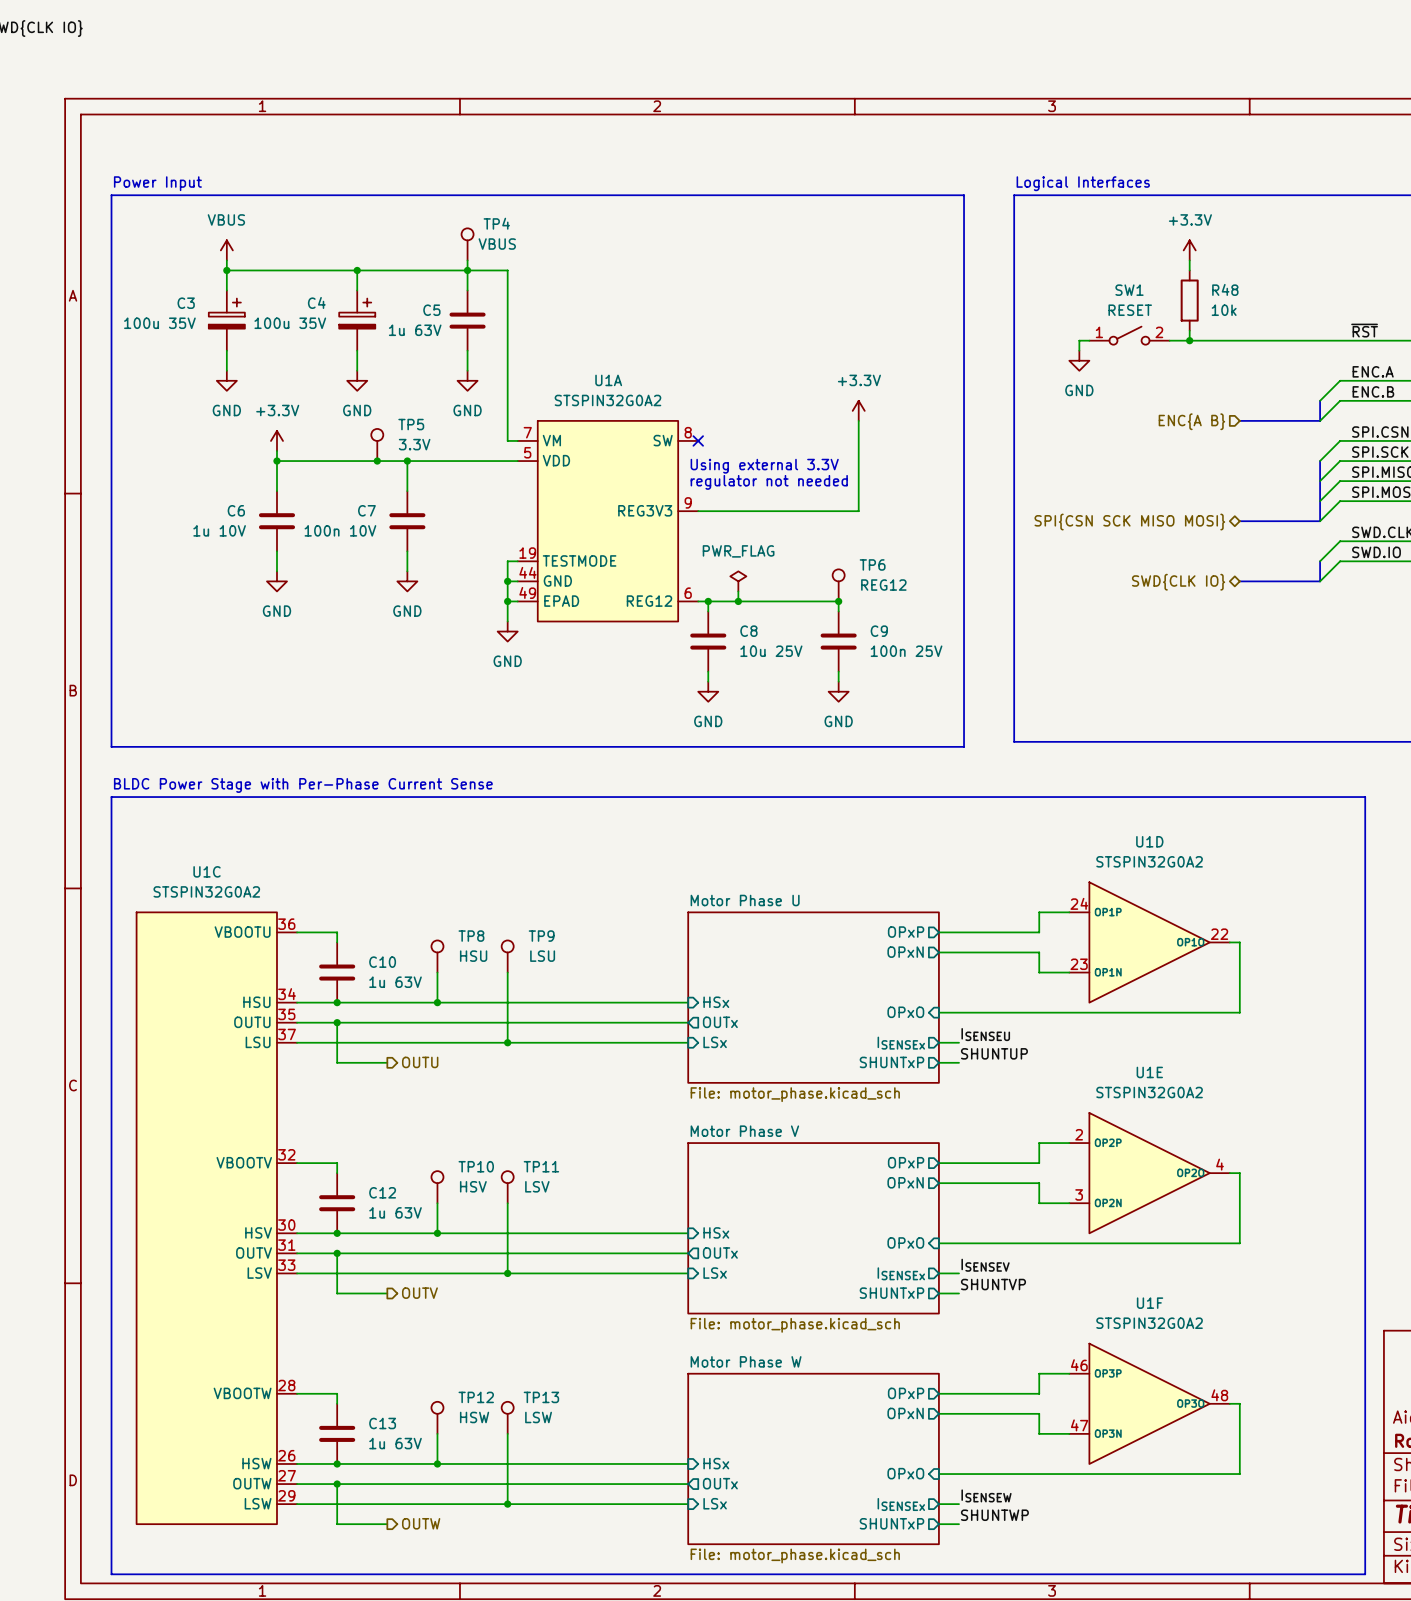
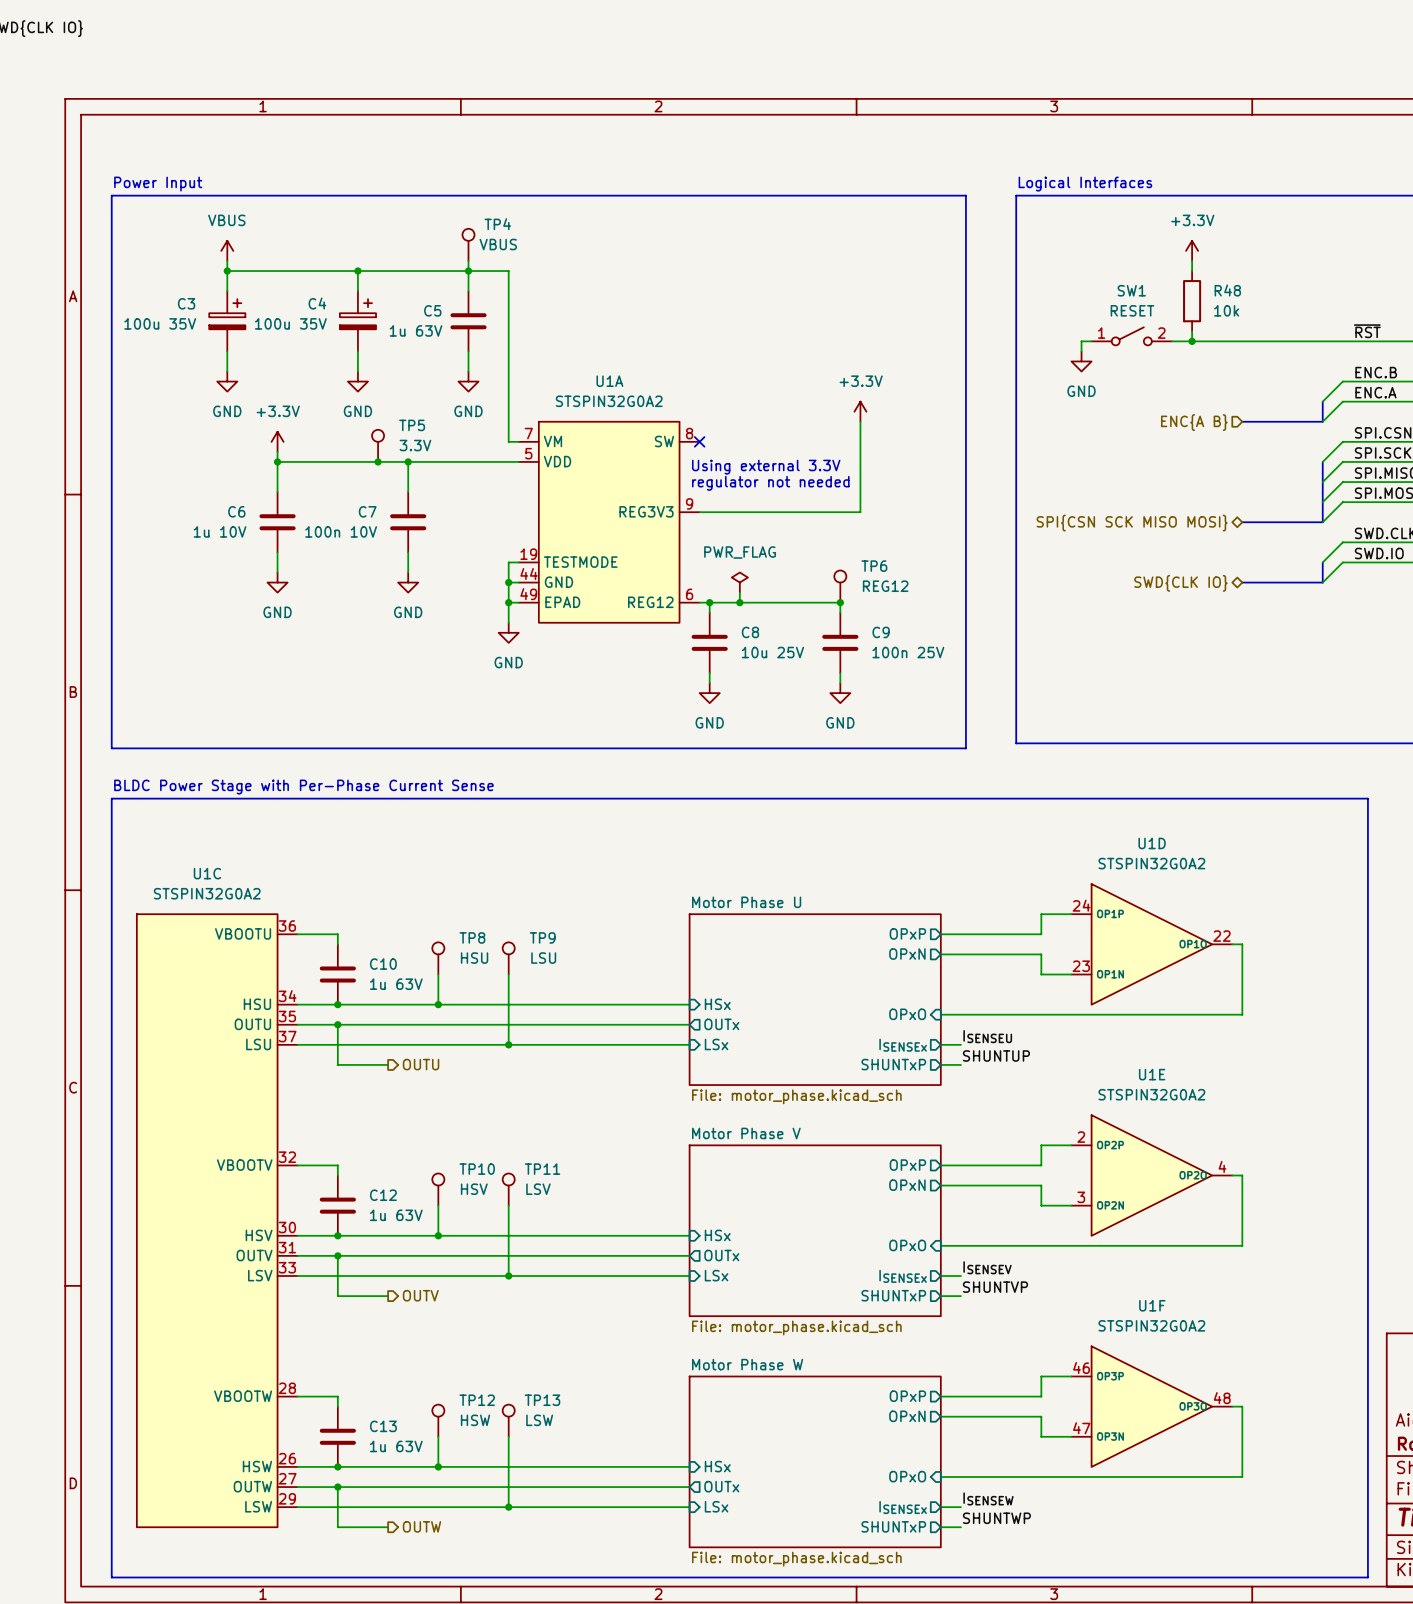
label: ENC.A (1373, 371) -> ENC.B (1376, 372)
label: ENC.B (1373, 391) -> ENC.A (1375, 392)

